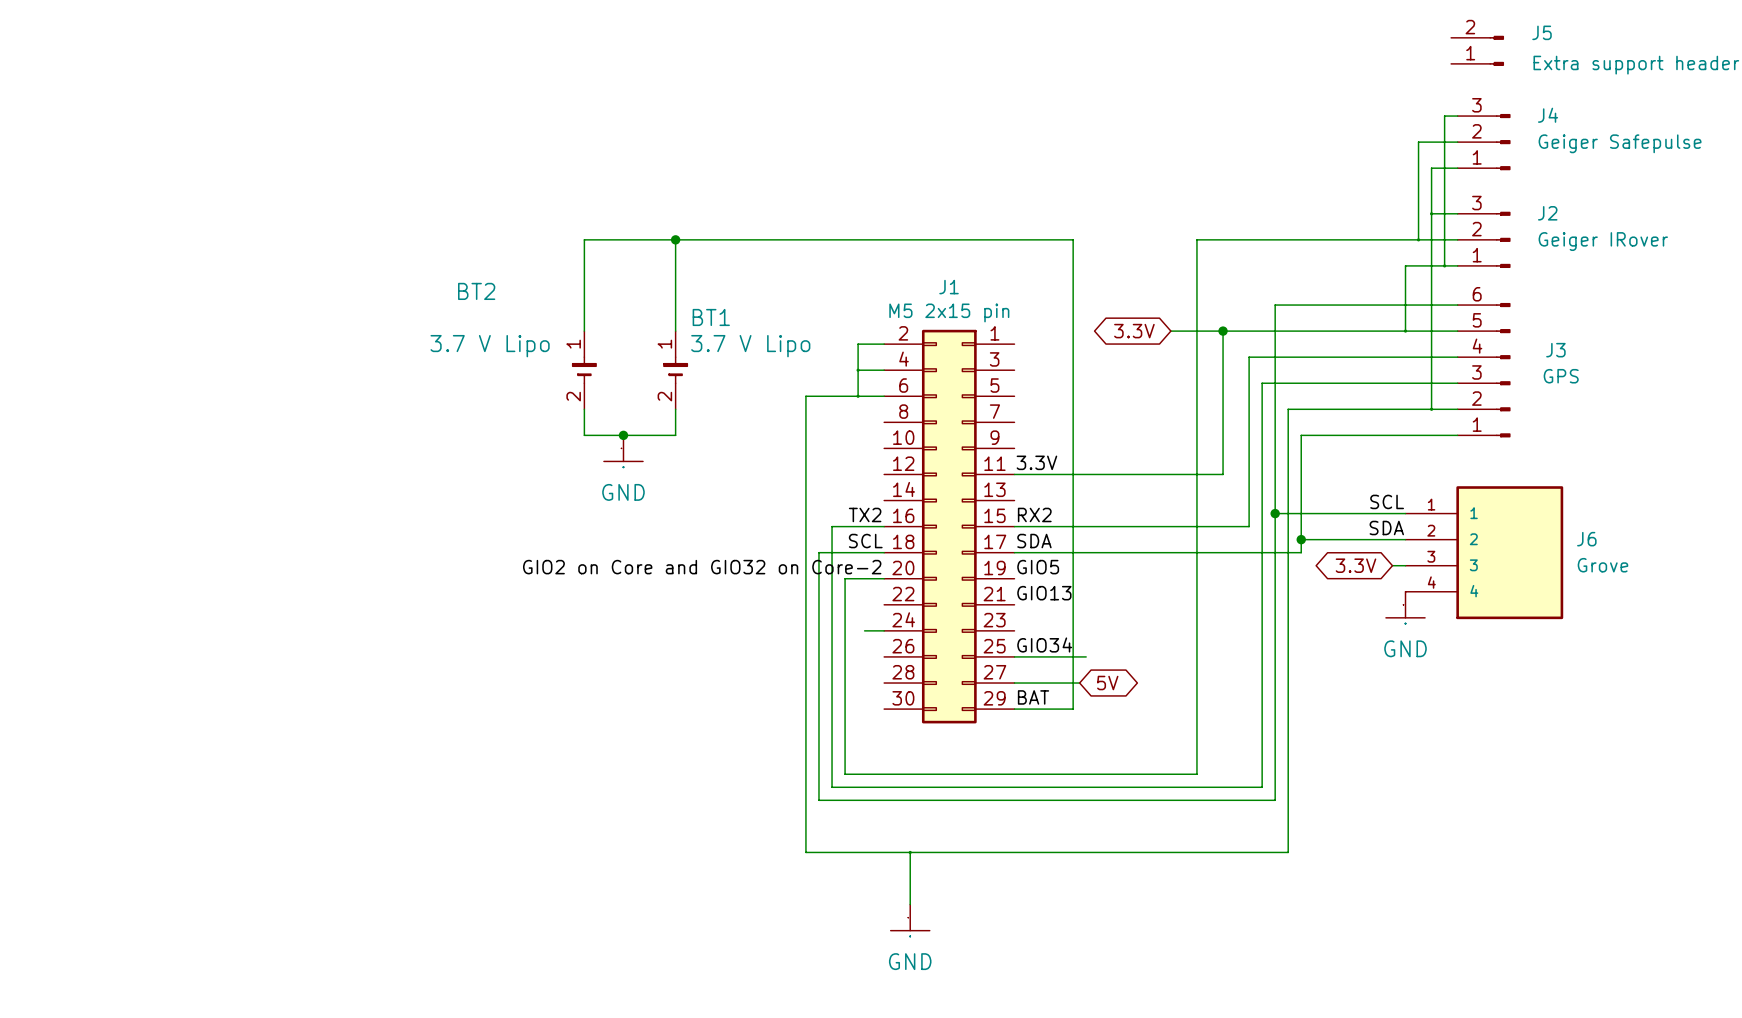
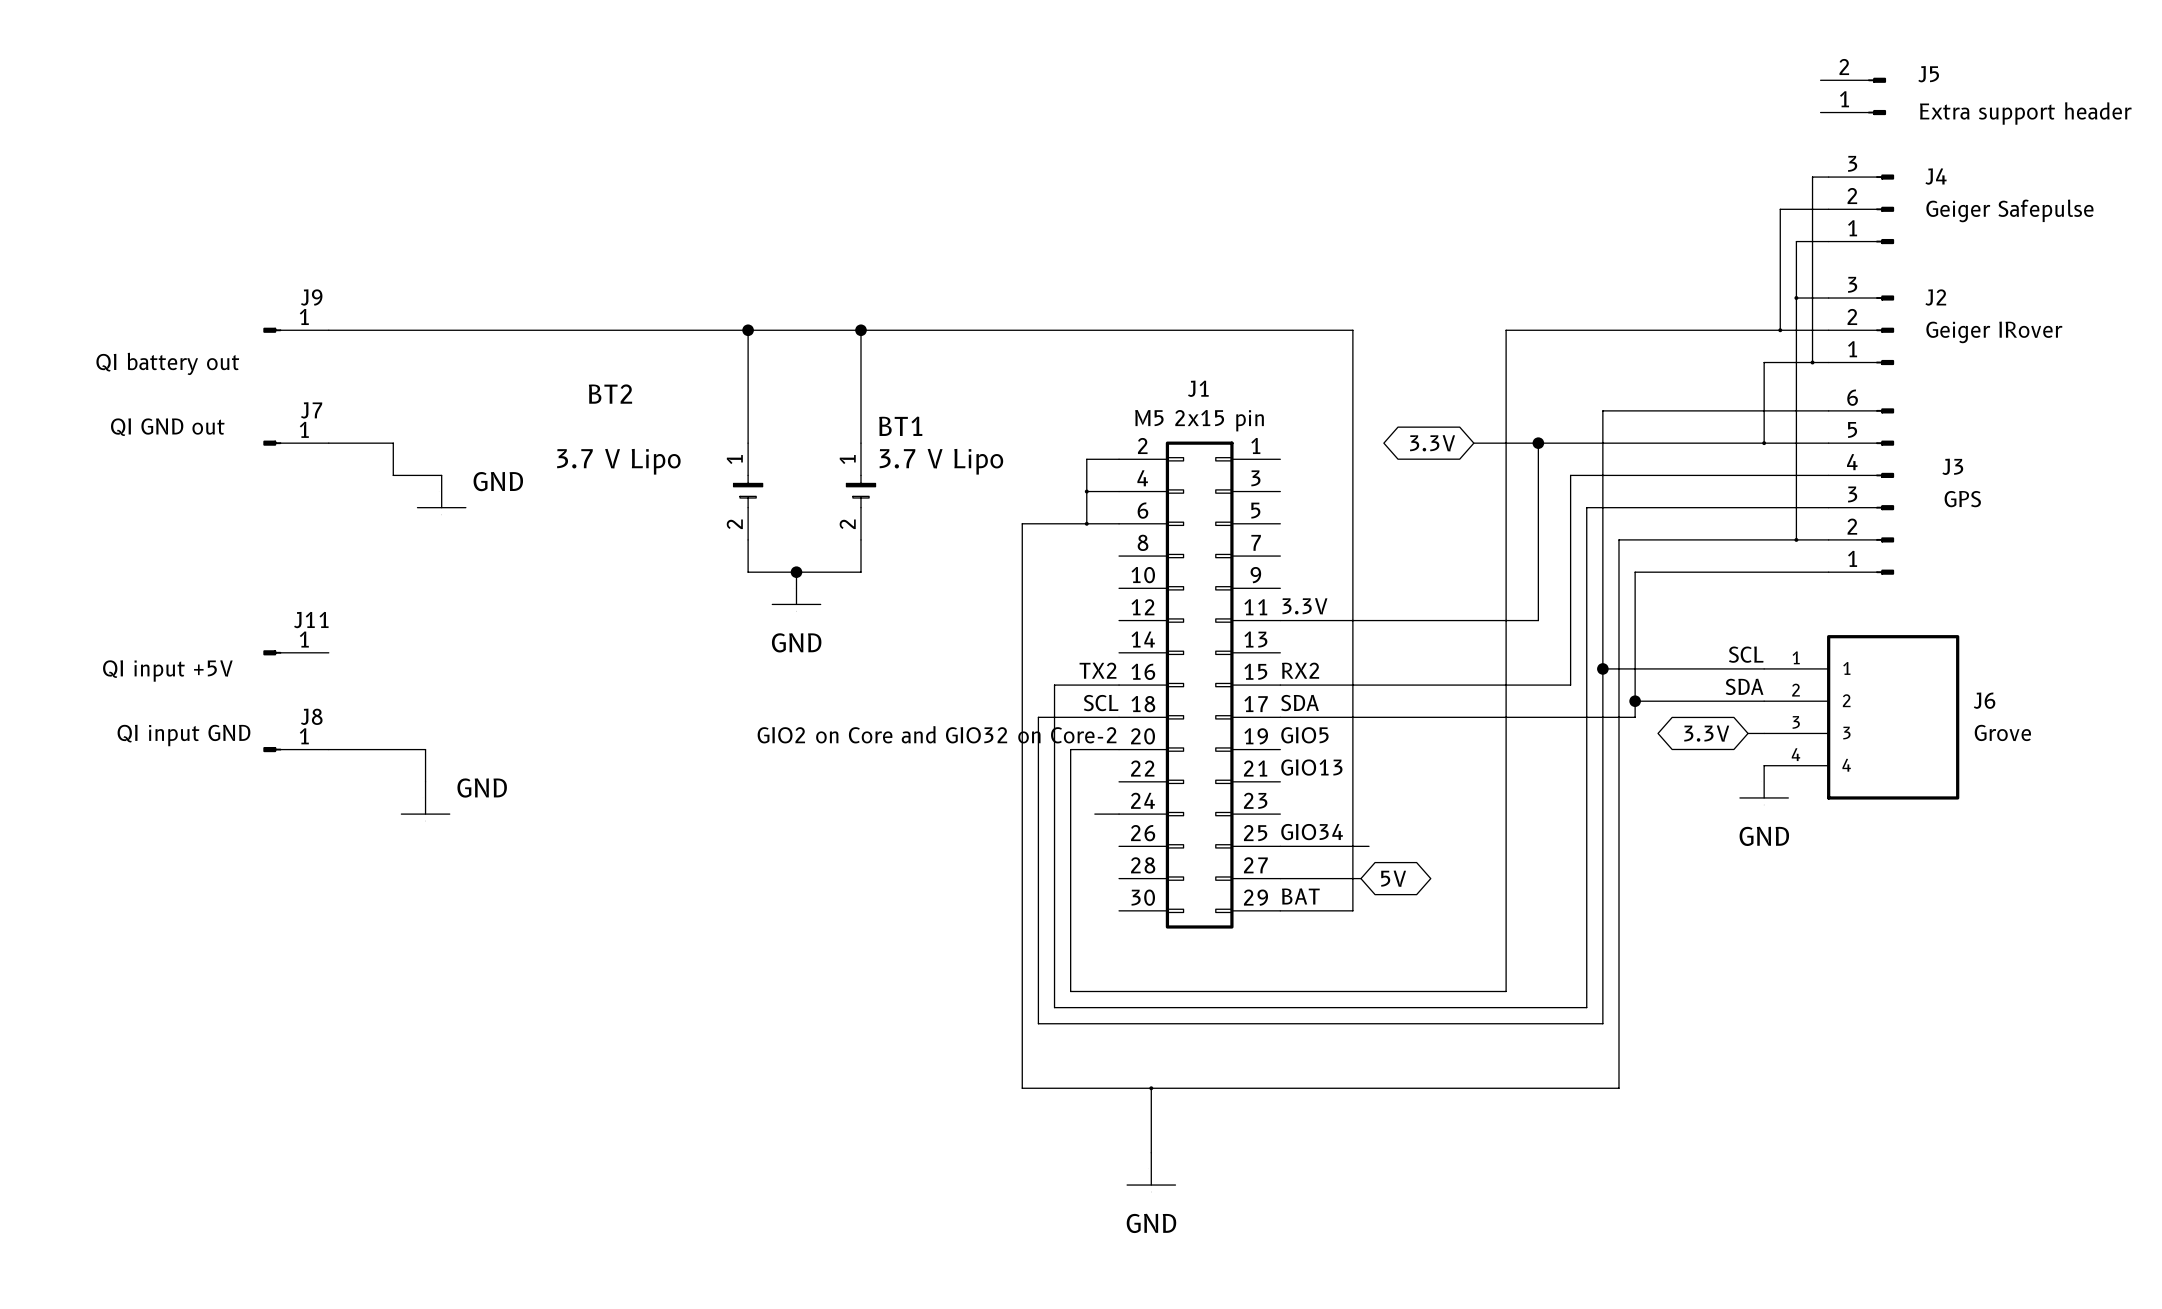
J9: none -> QI battery out (296, 330)
wire: none -> (328, 330) (748, 330)
junction: none -> (748, 330)
J7: none -> QI GND out (296, 443)
wire: none -> (328, 443) (393, 443) (393, 475) (441, 475)
power symbol: none -> GND (441, 491)
J11: none -> QI input +5V (296, 652)
J8: none -> QI input GND (296, 749)
wire: none -> (328, 749) (425, 749) (425, 781)
power symbol: none -> GND (425, 797)

